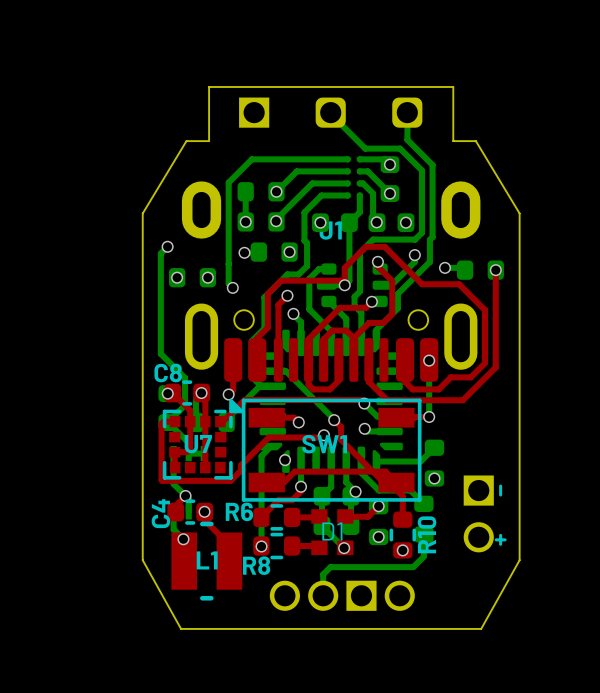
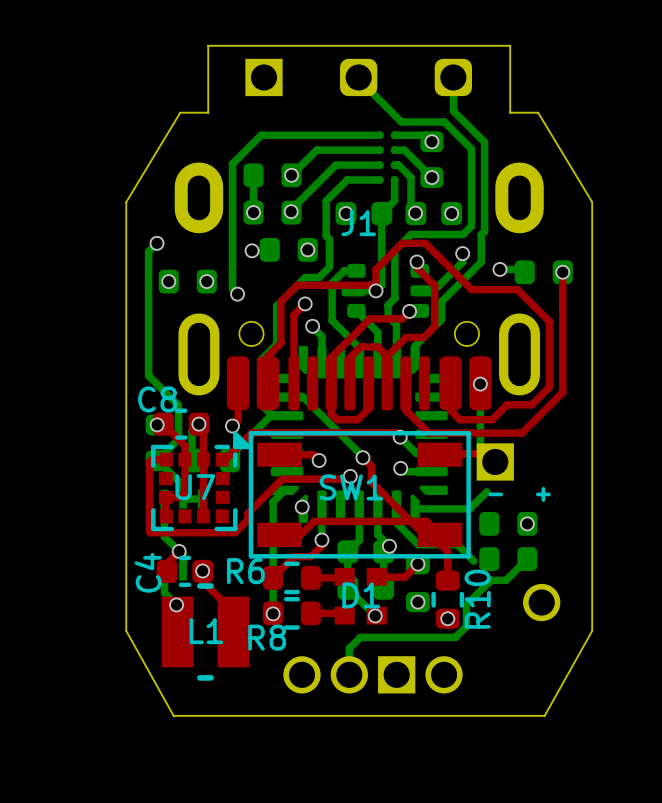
via: (429, 416) -> none
line: none -> (490, 494) (501, 494)
part rotation: 0° (434, 463) -> 90° clockwise (508, 523)
via position: (434, 478) -> (527, 523)
line: (500, 486) (500, 495) -> none
part position: (478, 490) -> (495, 461)
part: none -> (508, 559)
part: (423, 519) -> none
bottom track: (423, 534) (423, 556) (413, 567) (330, 567) -> (527, 559) (506, 580) (490, 580) (466, 604) (466, 626) (455, 637) (360, 637) (358, 639)
line: (500, 535) (500, 544) -> (543, 488) (543, 500)
line: (496, 539) (505, 539) -> (537, 494) (548, 494)

